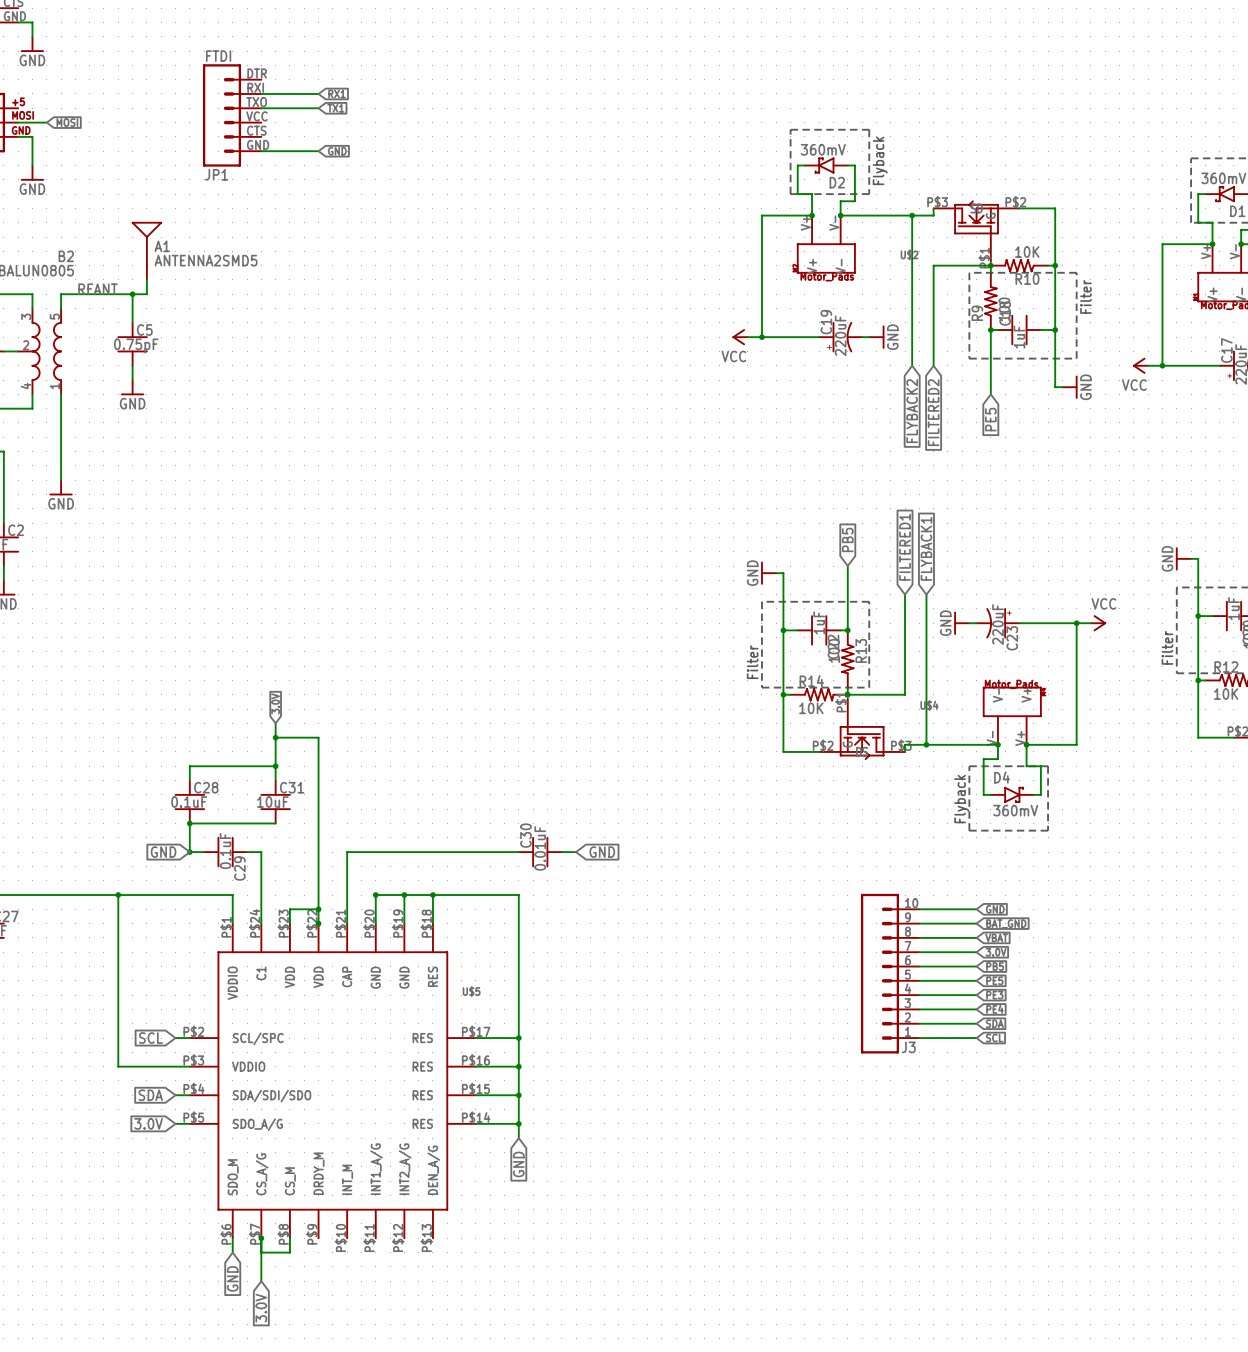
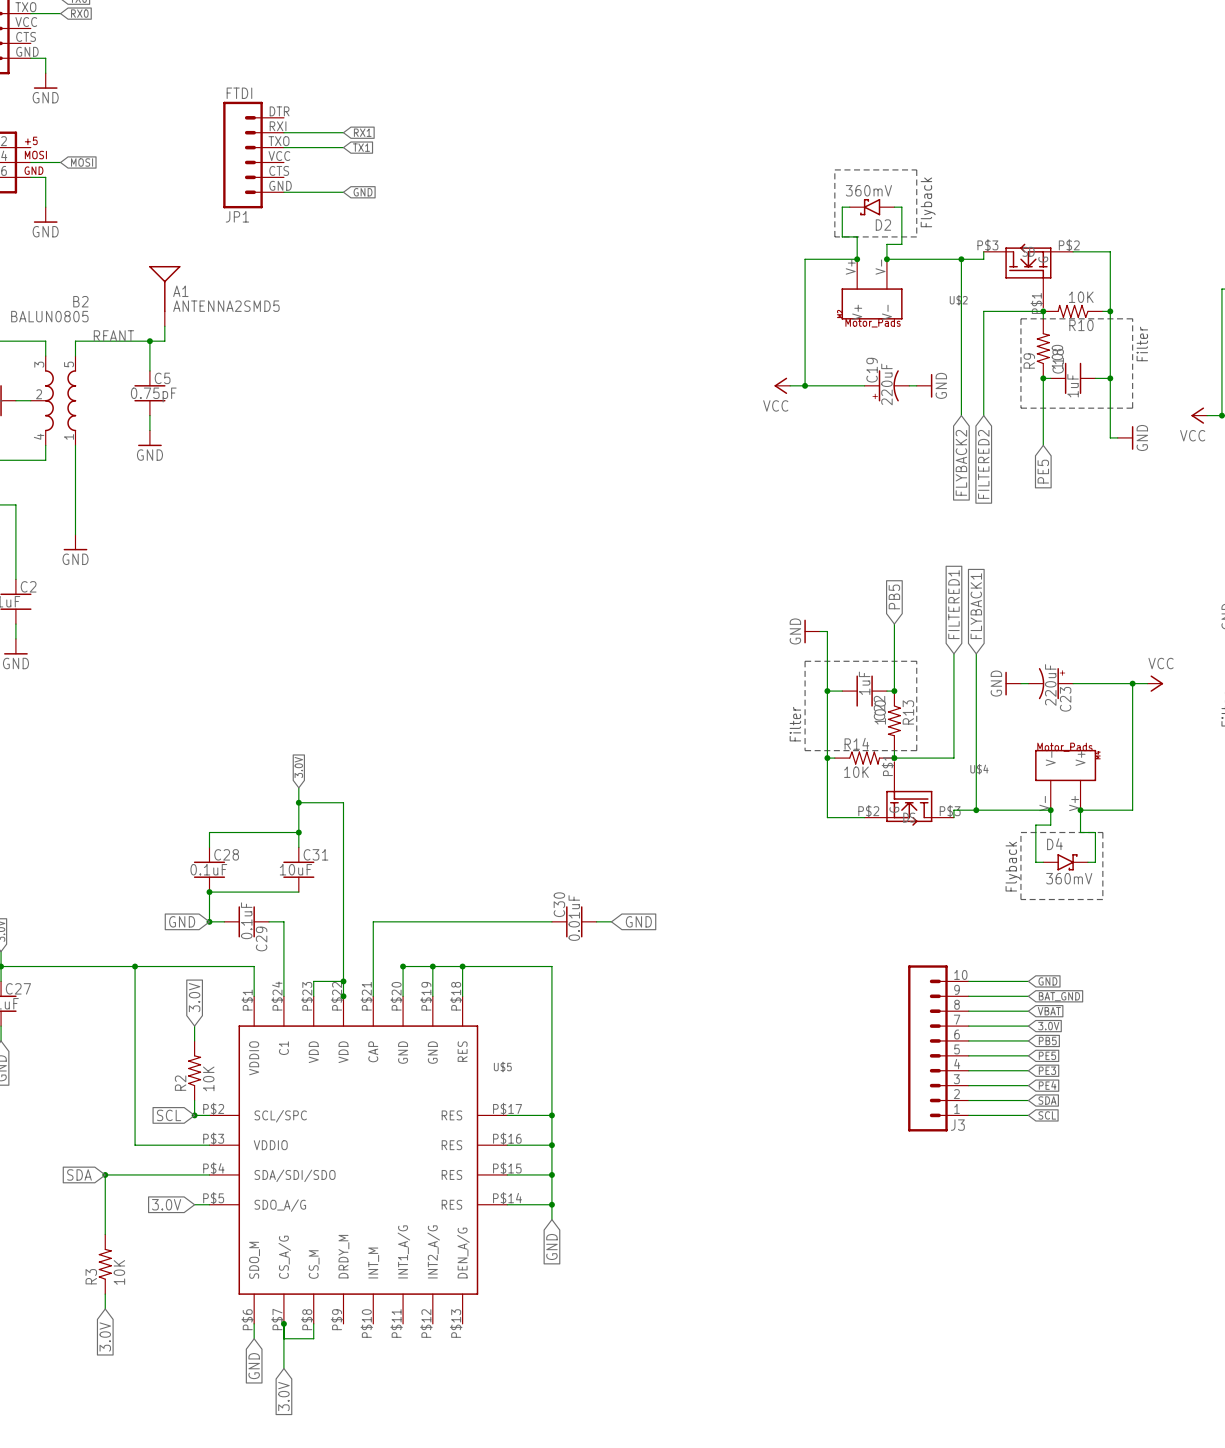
global label: none -> 3.0V (194, 997)
wire: none -> (194, 1026) (194, 1040)
R2: none -> 10K (194, 1070)
wire: none -> (194, 1100) (194, 1115)
junction: none -> (194, 1115)
junction: none -> (105, 1174)
global label position: SDA (150, 1095) -> SDA (79, 1174)
wire: none -> (194, 1174) (105, 1174) (105, 1234)
R3: none -> 10K (105, 1264)
wire: none -> (105, 1294) (105, 1308)
global label: none -> 3.0V (105, 1336)

